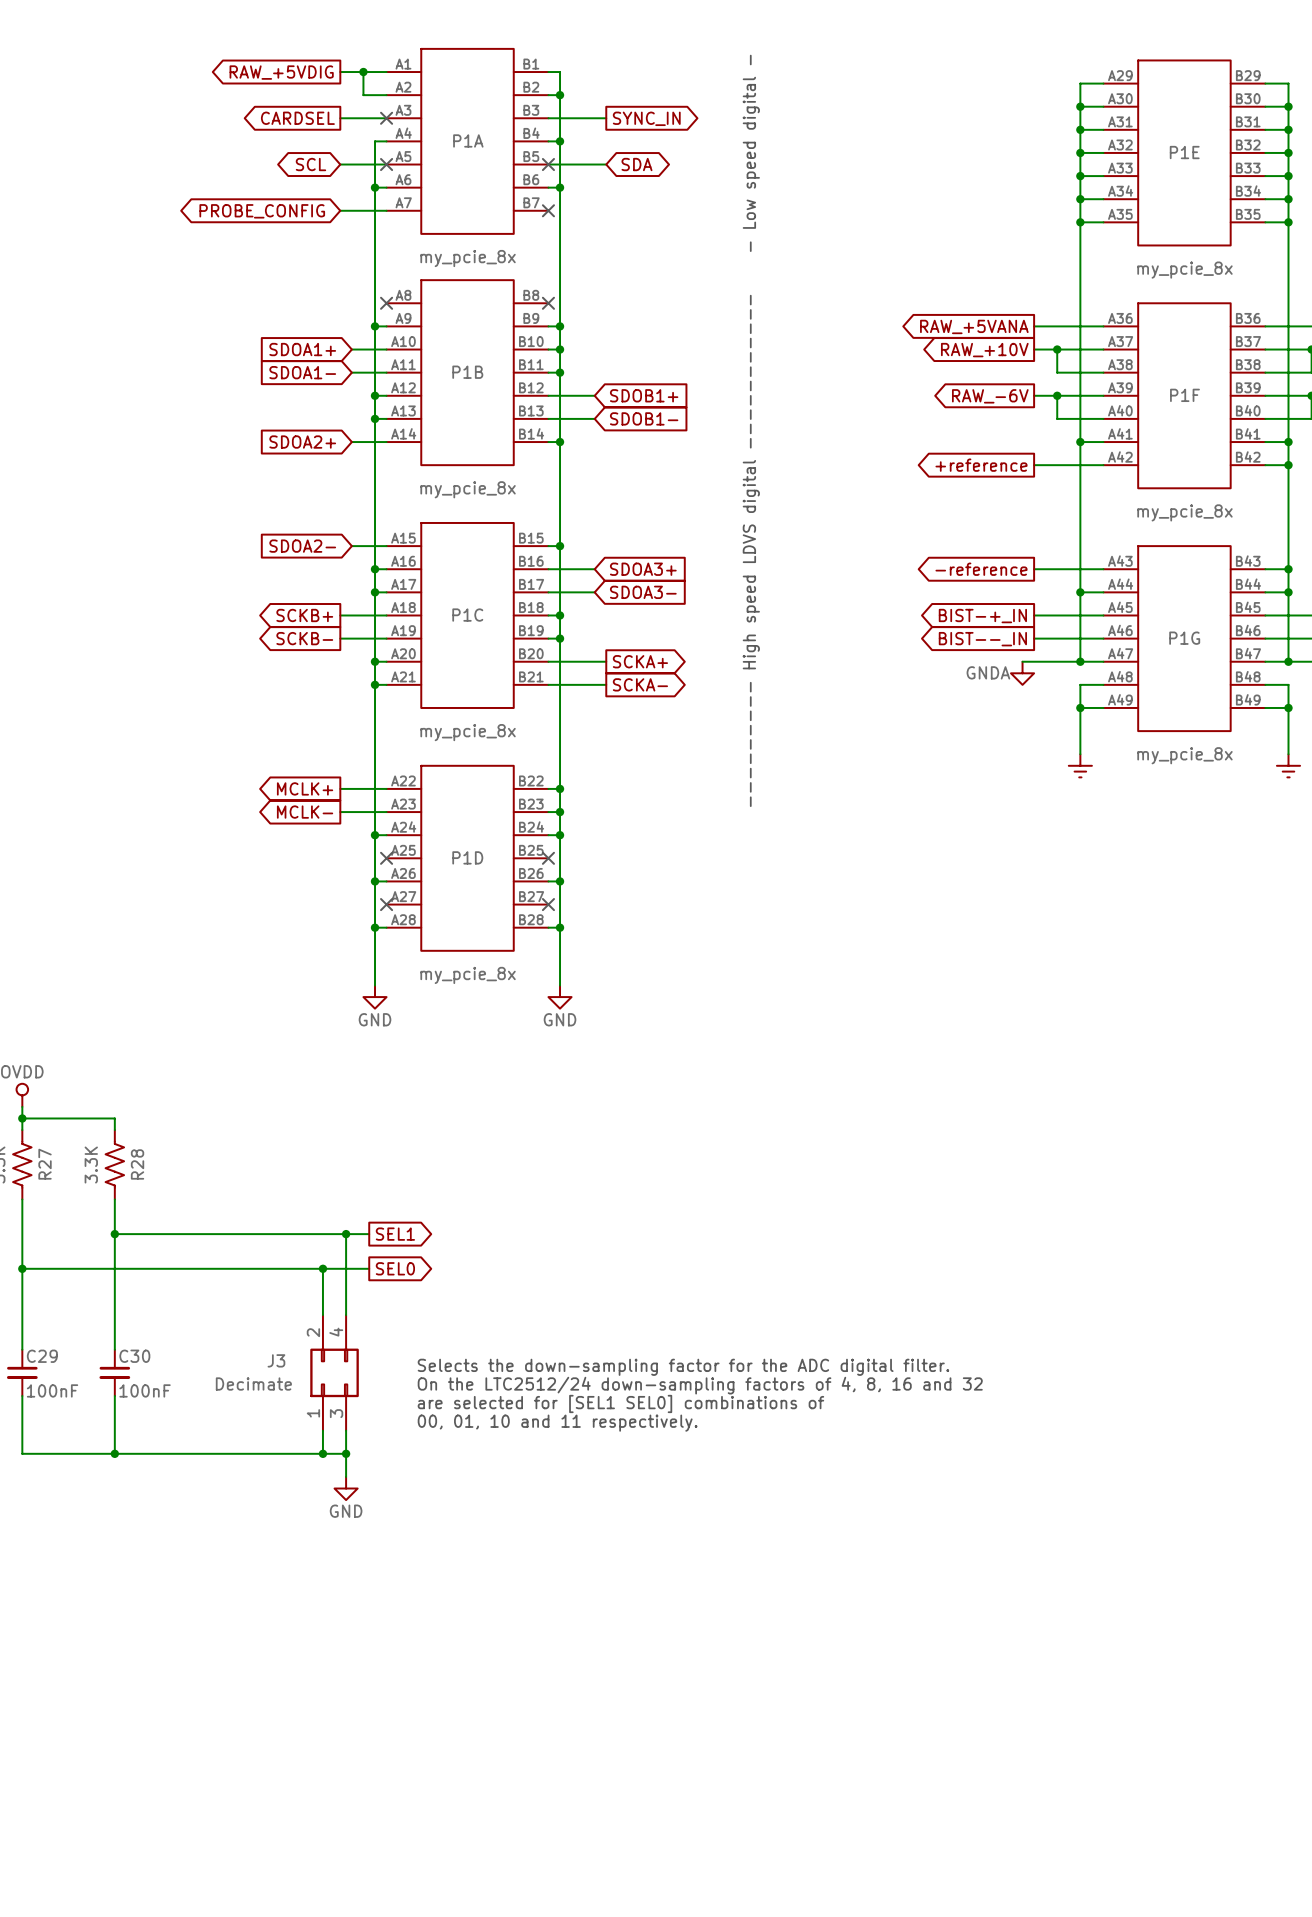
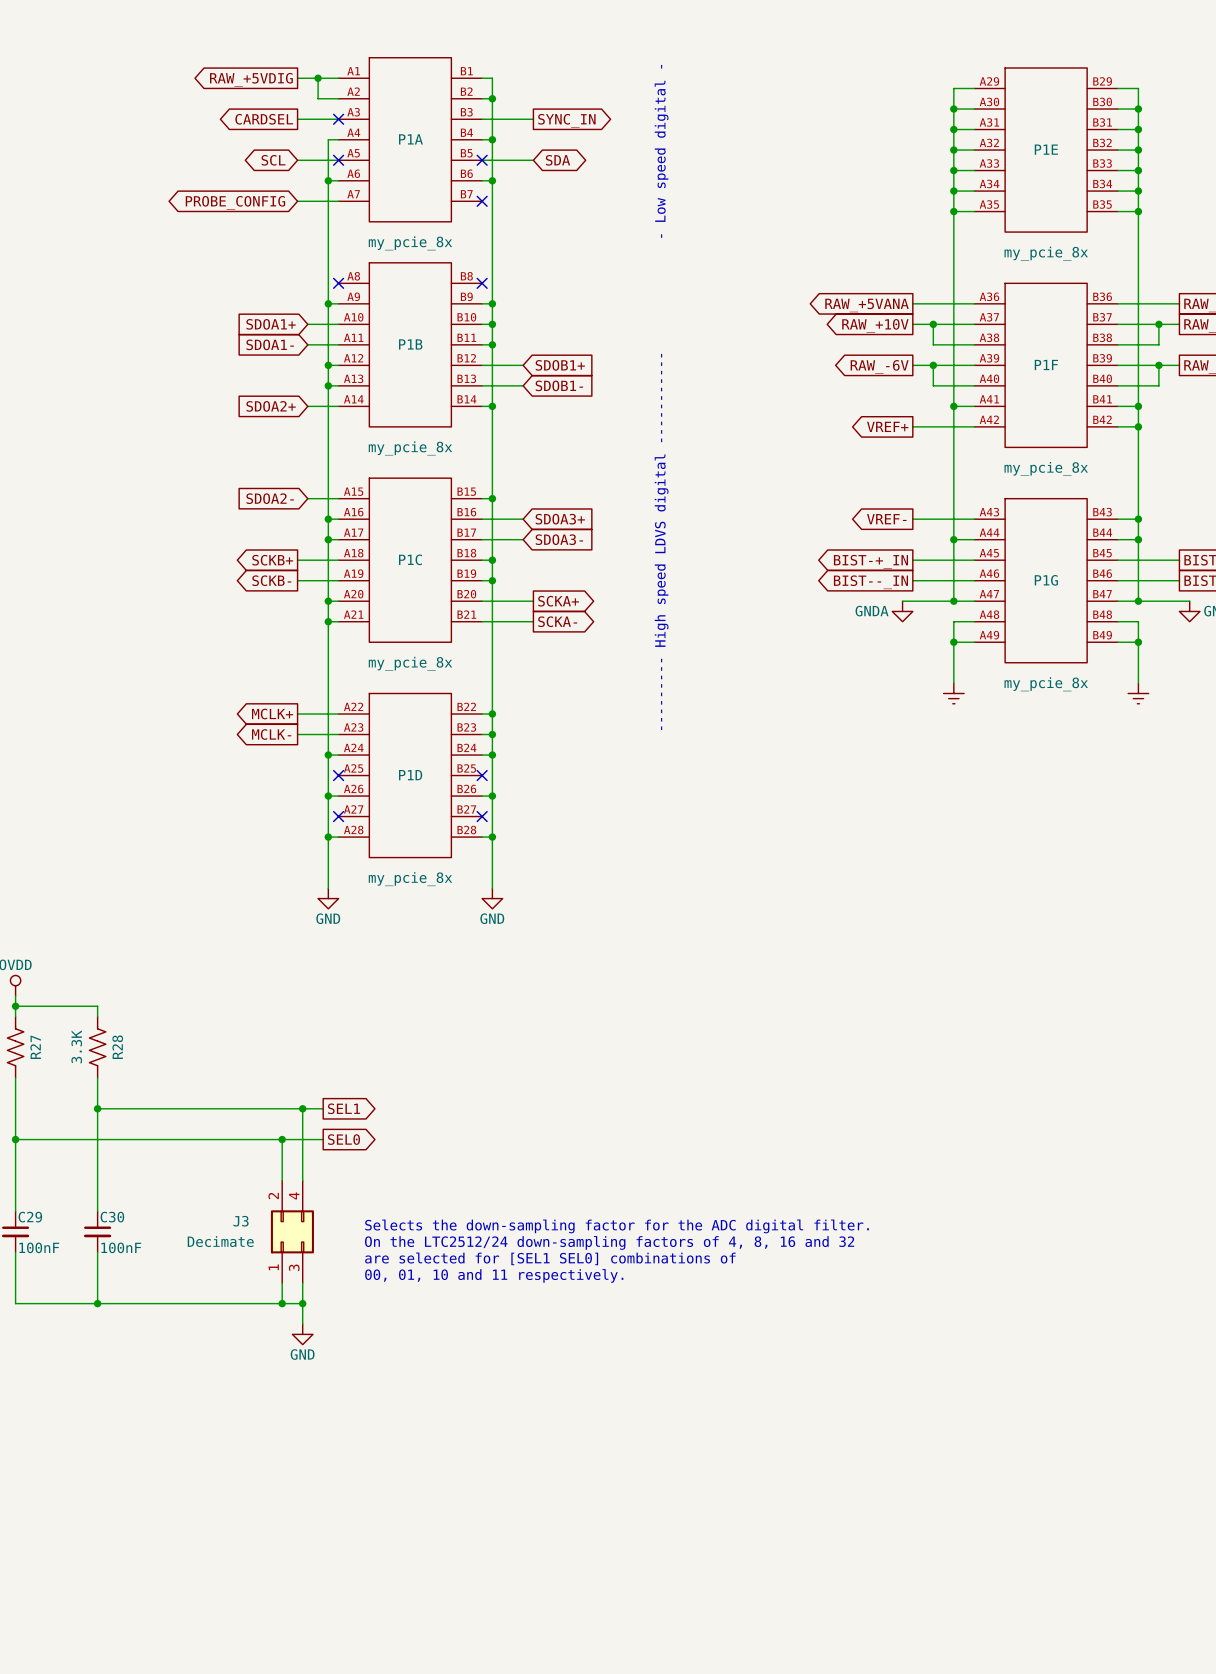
global label: +reference (981, 465) -> VREF+ (887, 426)
global label: -reference (981, 569) -> VREF- (886, 519)

